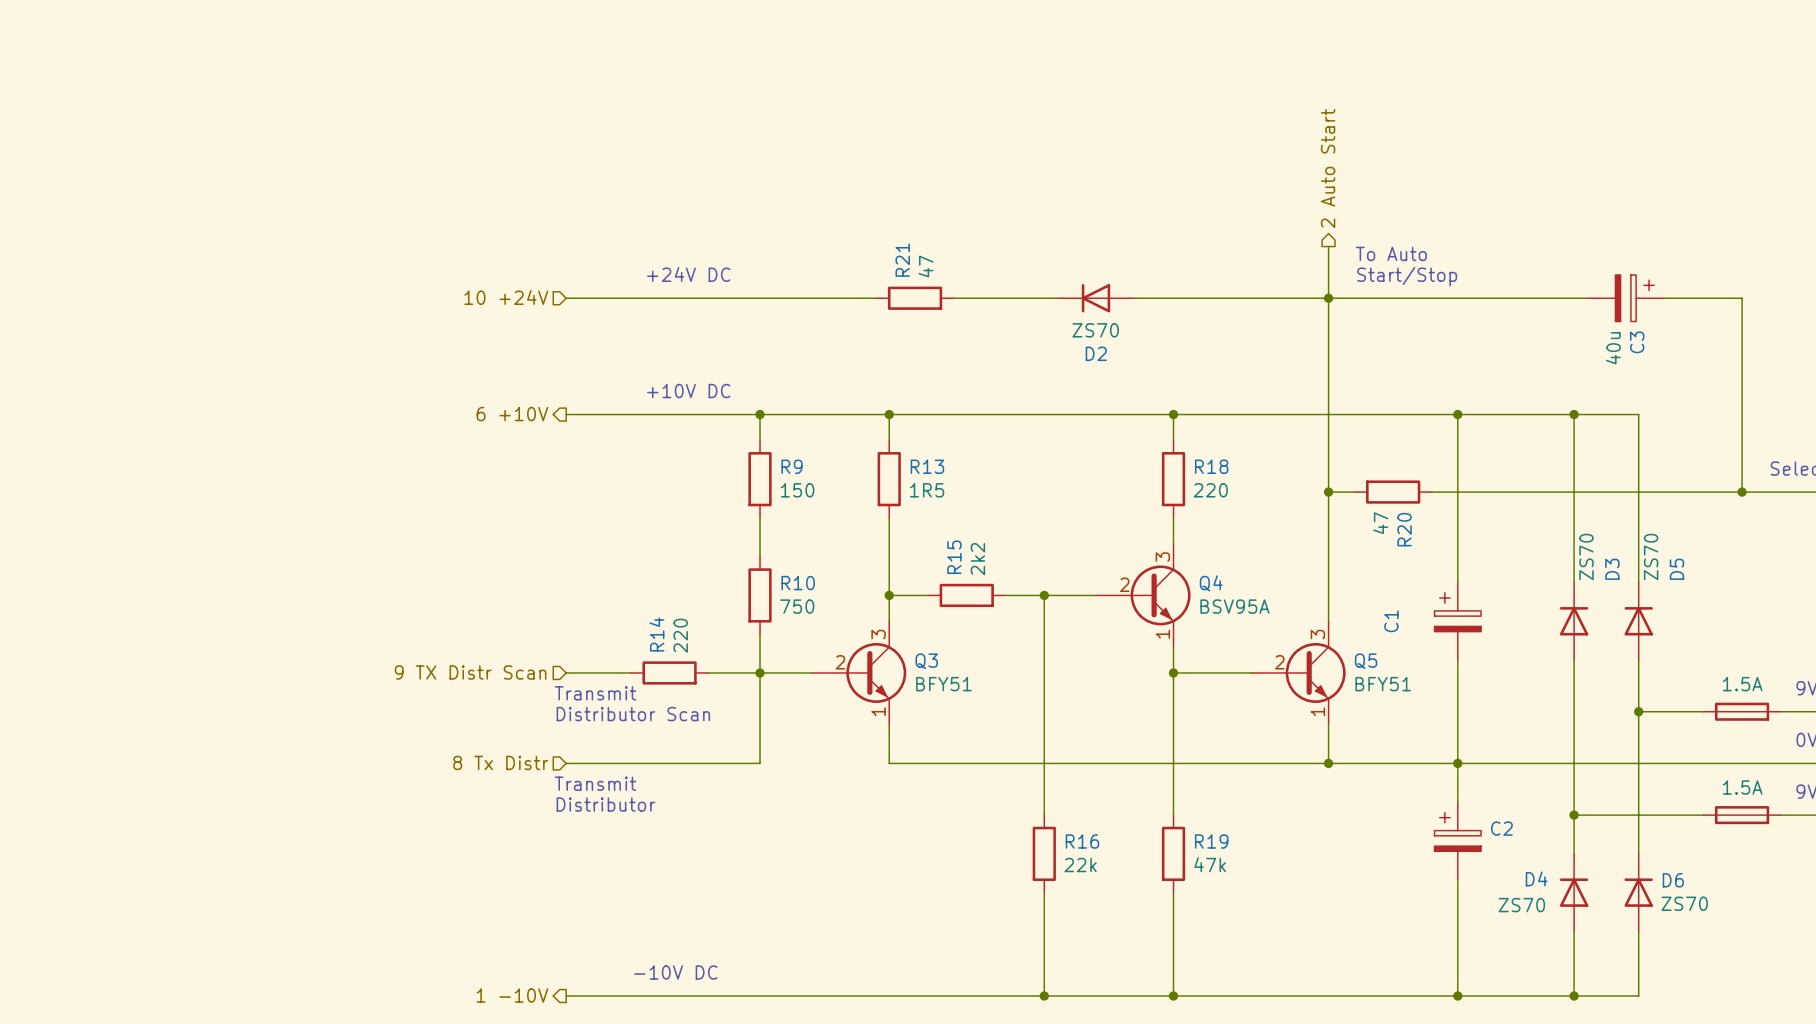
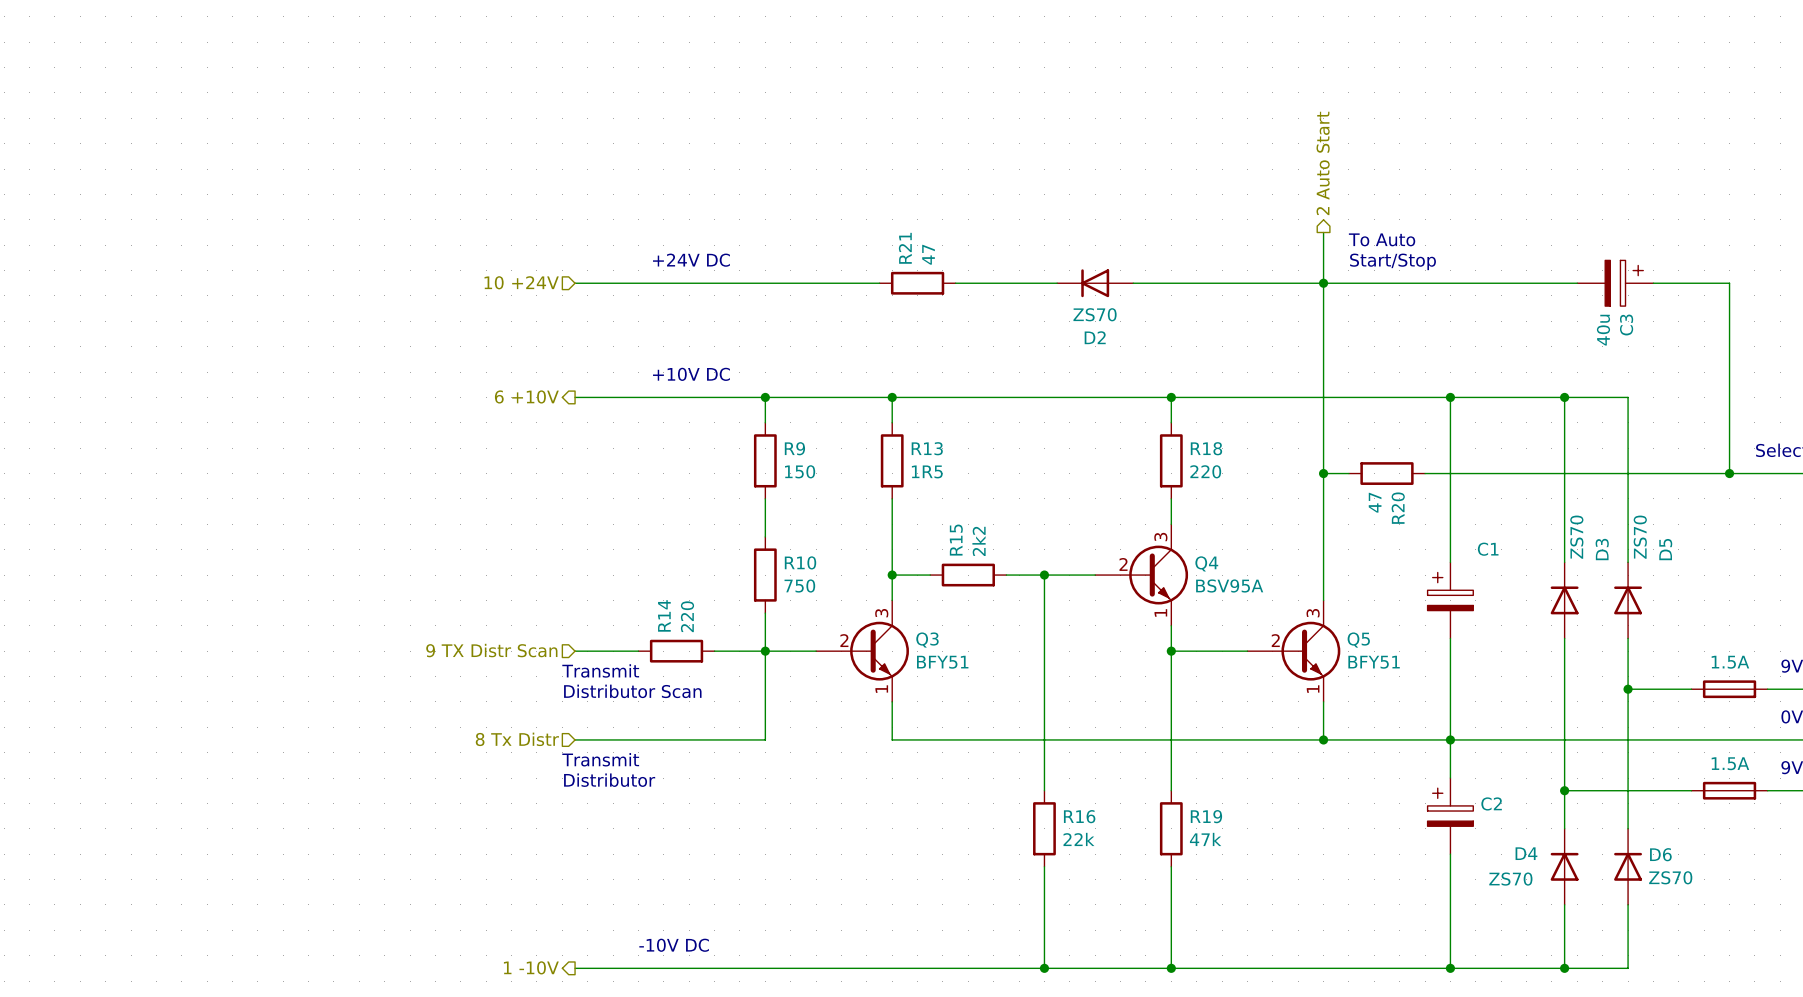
C1 name rotation: 0° (1391, 621) -> 90° clockwise (1488, 549)
C1 name position: C1 (1391, 621) -> C1 (1488, 549)

